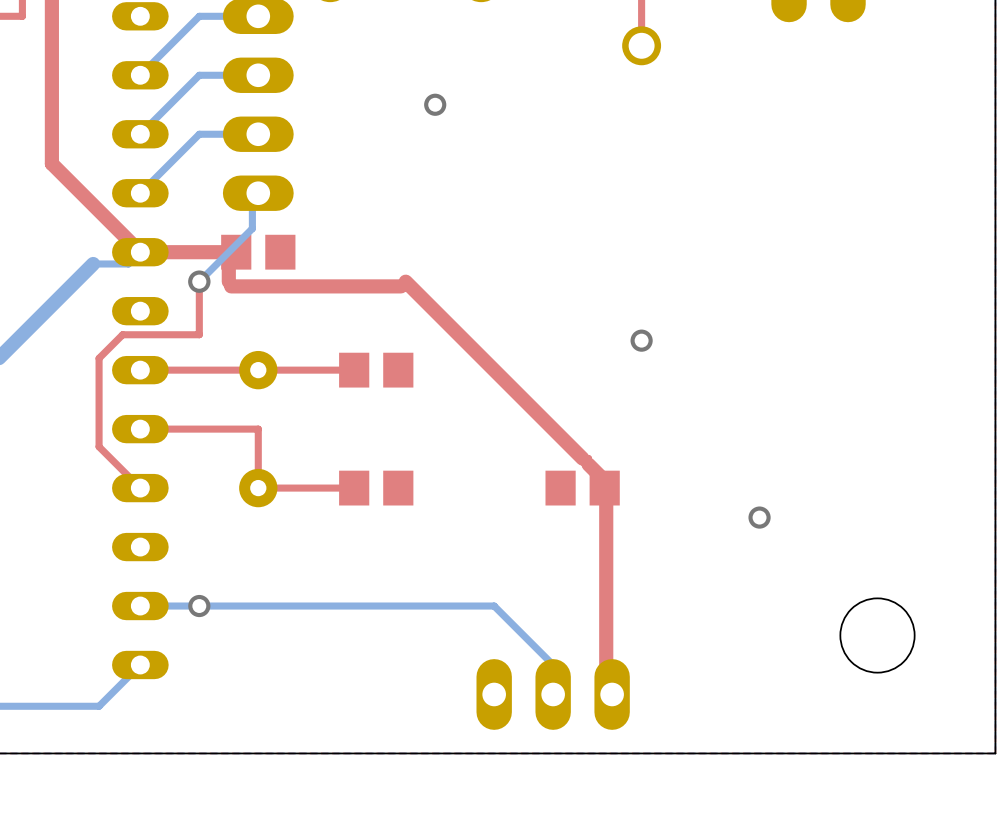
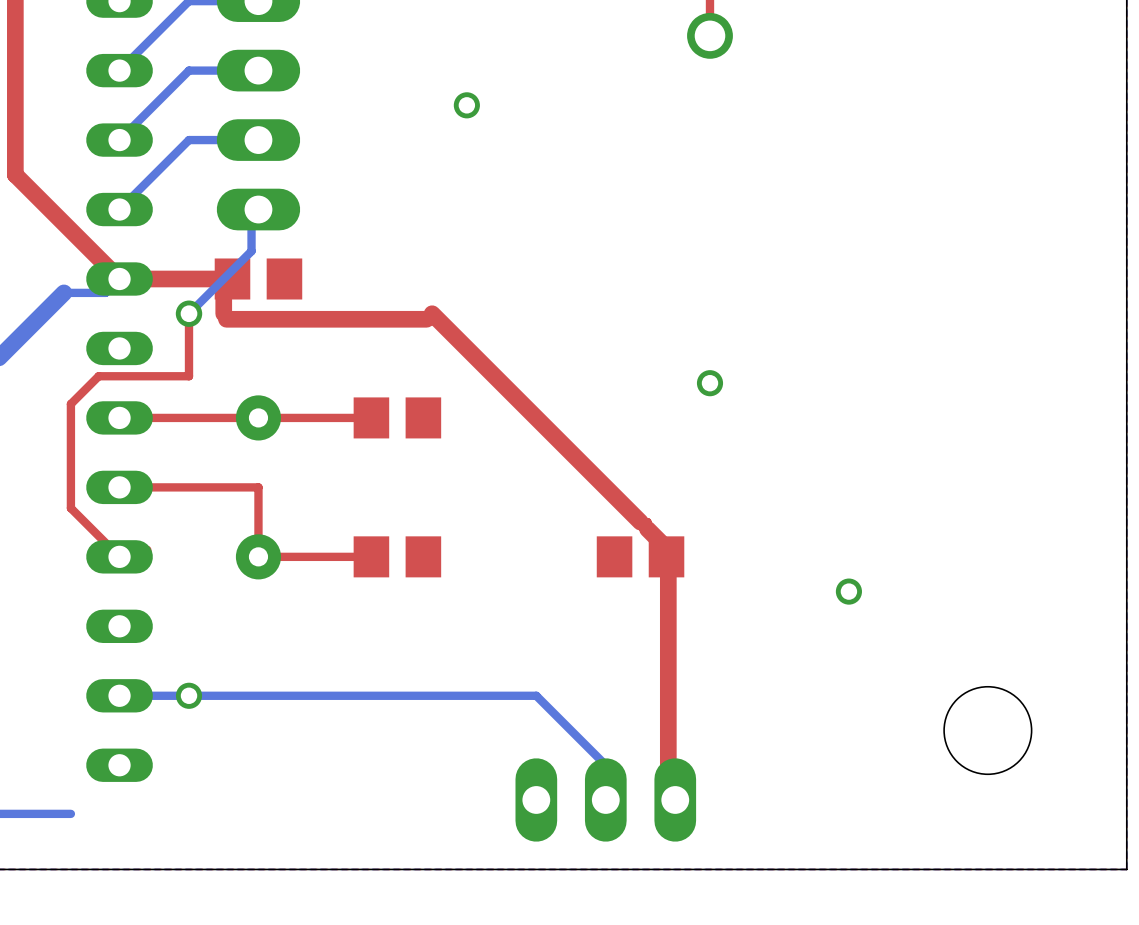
bottom track: (140, 664) (99, 706) -> none

